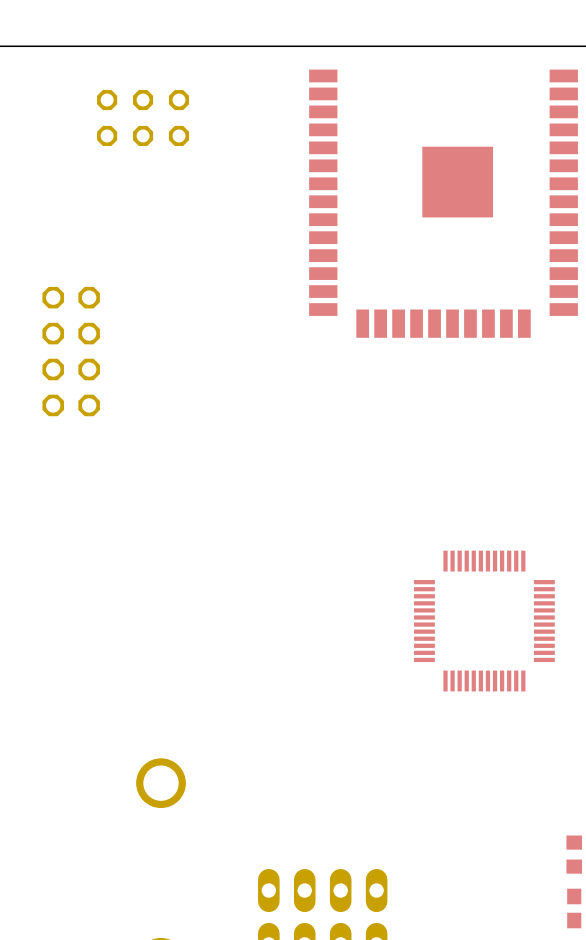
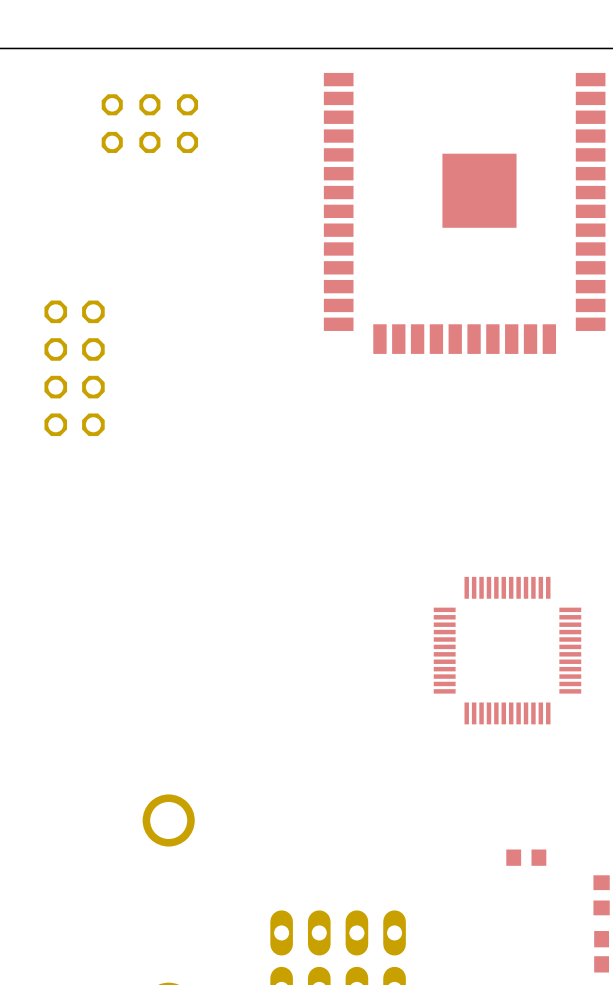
part: none -> (526, 857)

